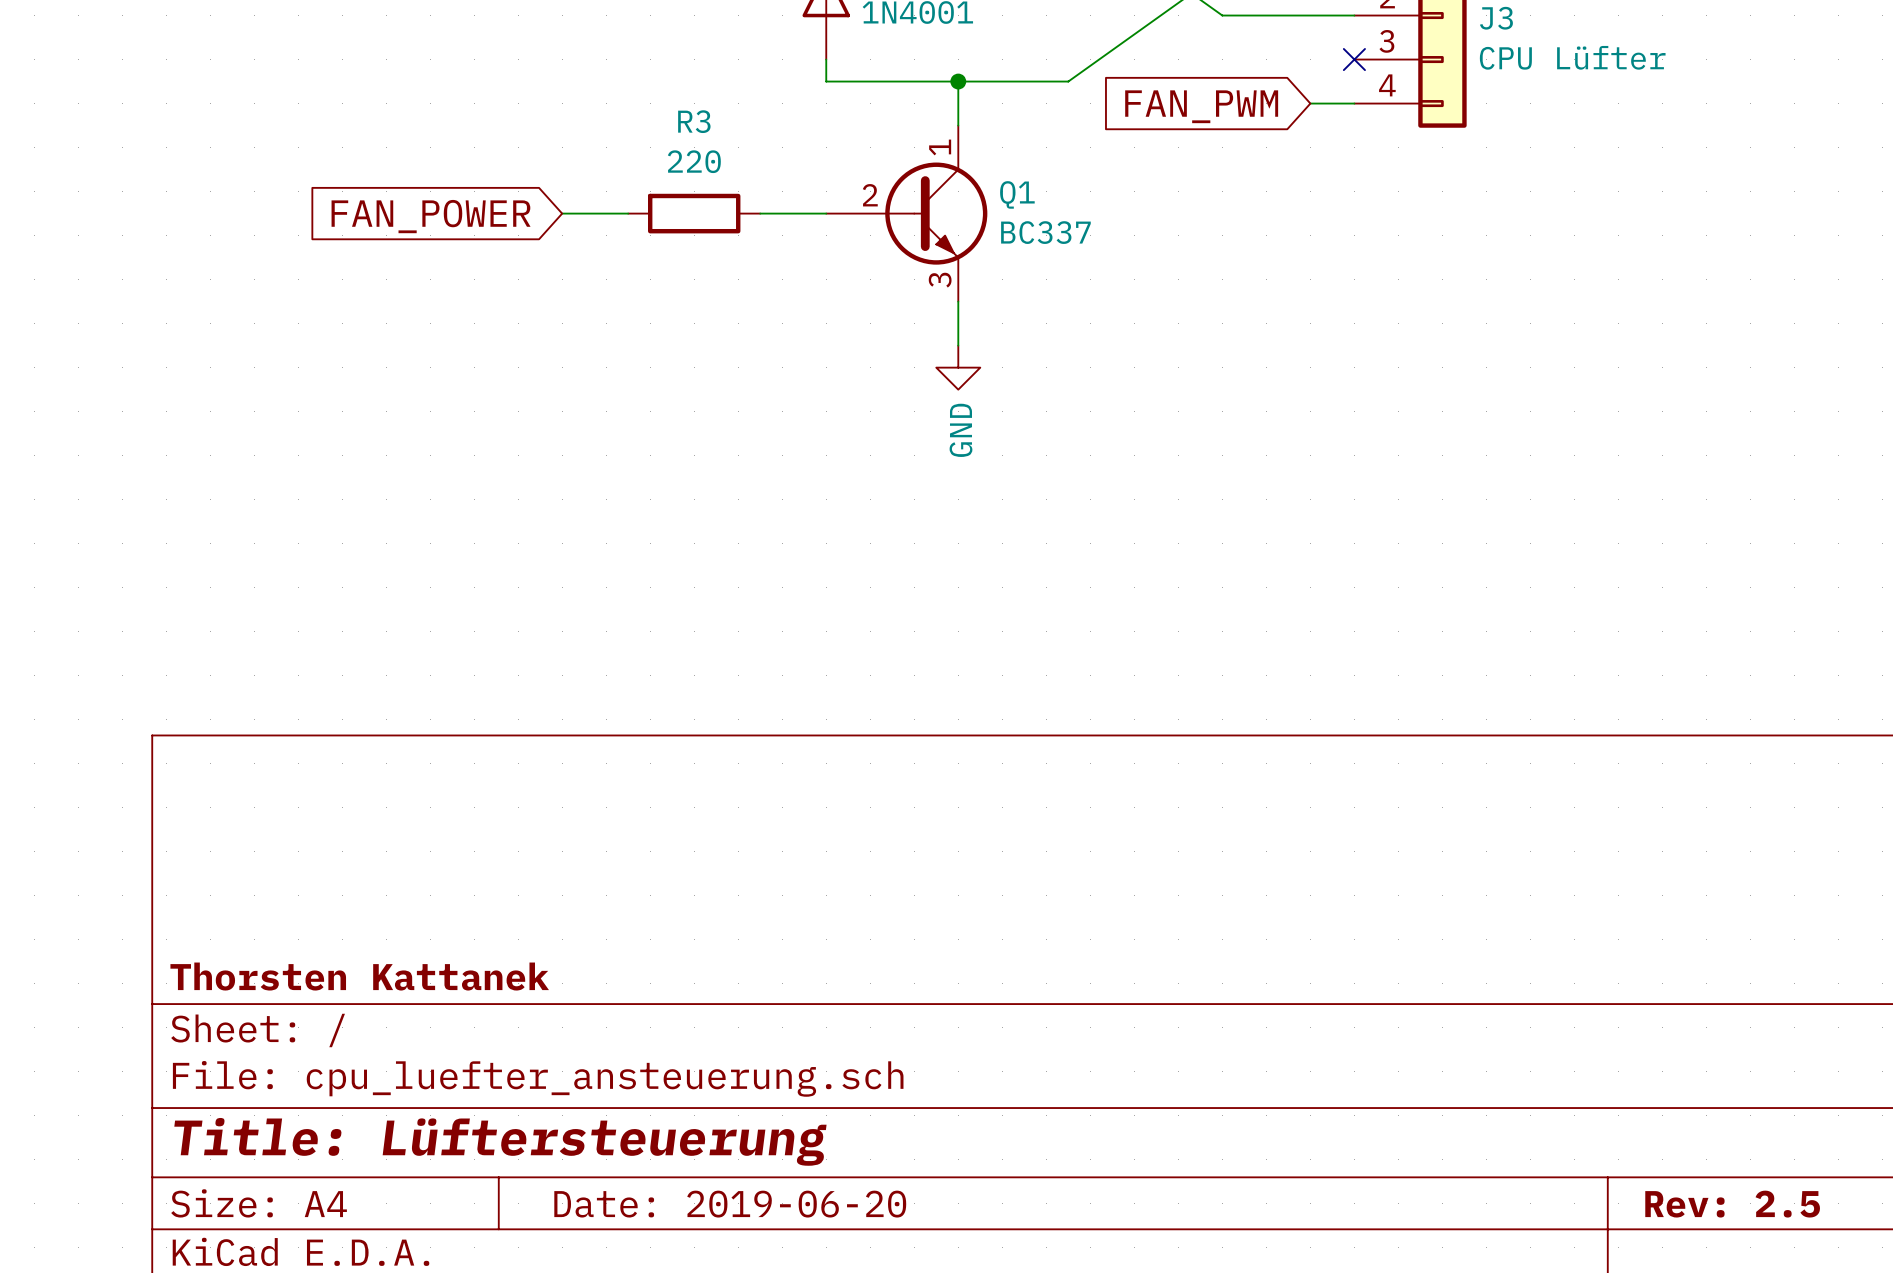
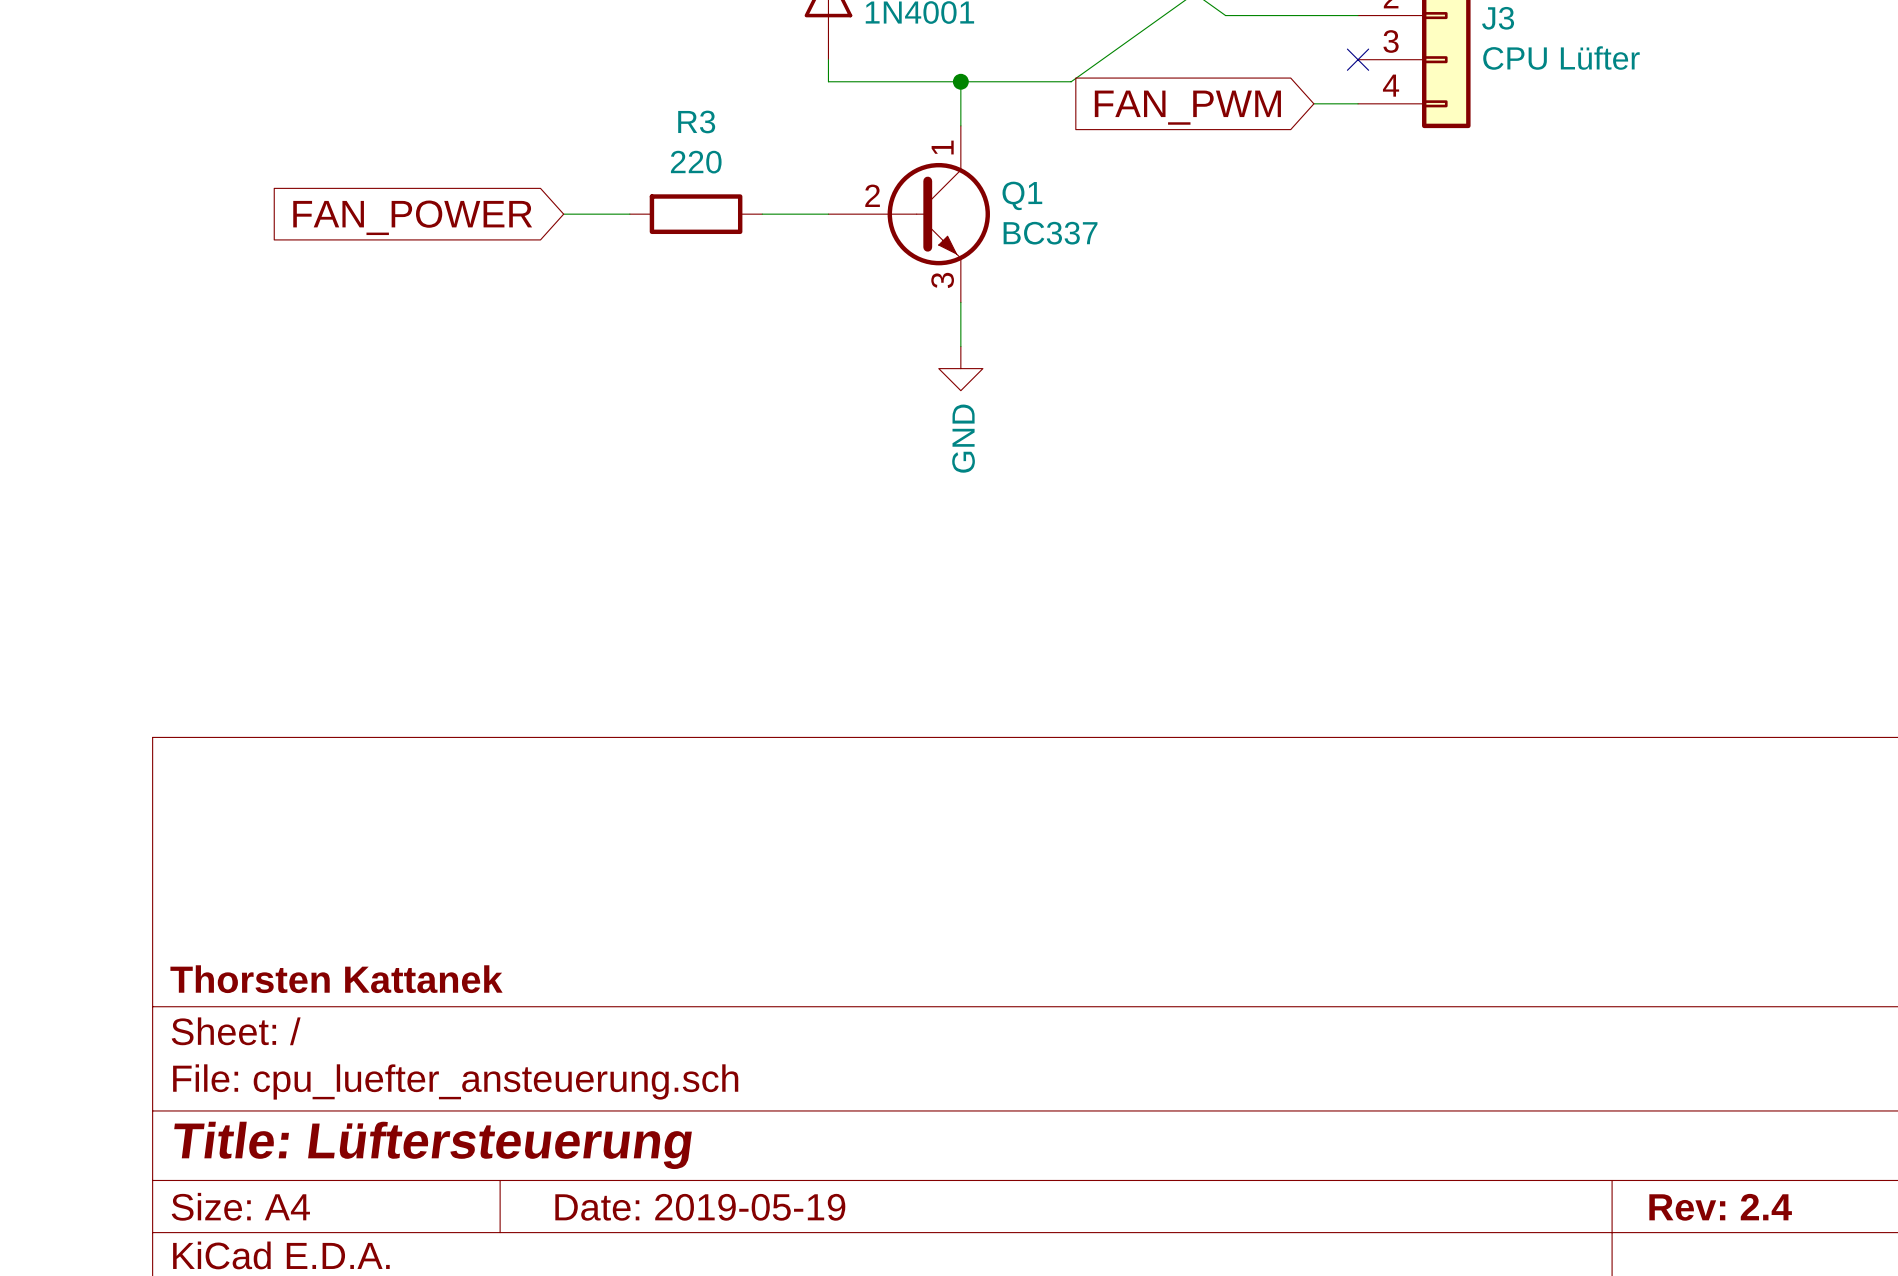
title block: Date: 2019-06-20 (730, 1204) -> Date: 2019-05-19 (700, 1207)
title block: Rev: 2.5 (1732, 1204) -> Rev: 2.4 (1720, 1207)

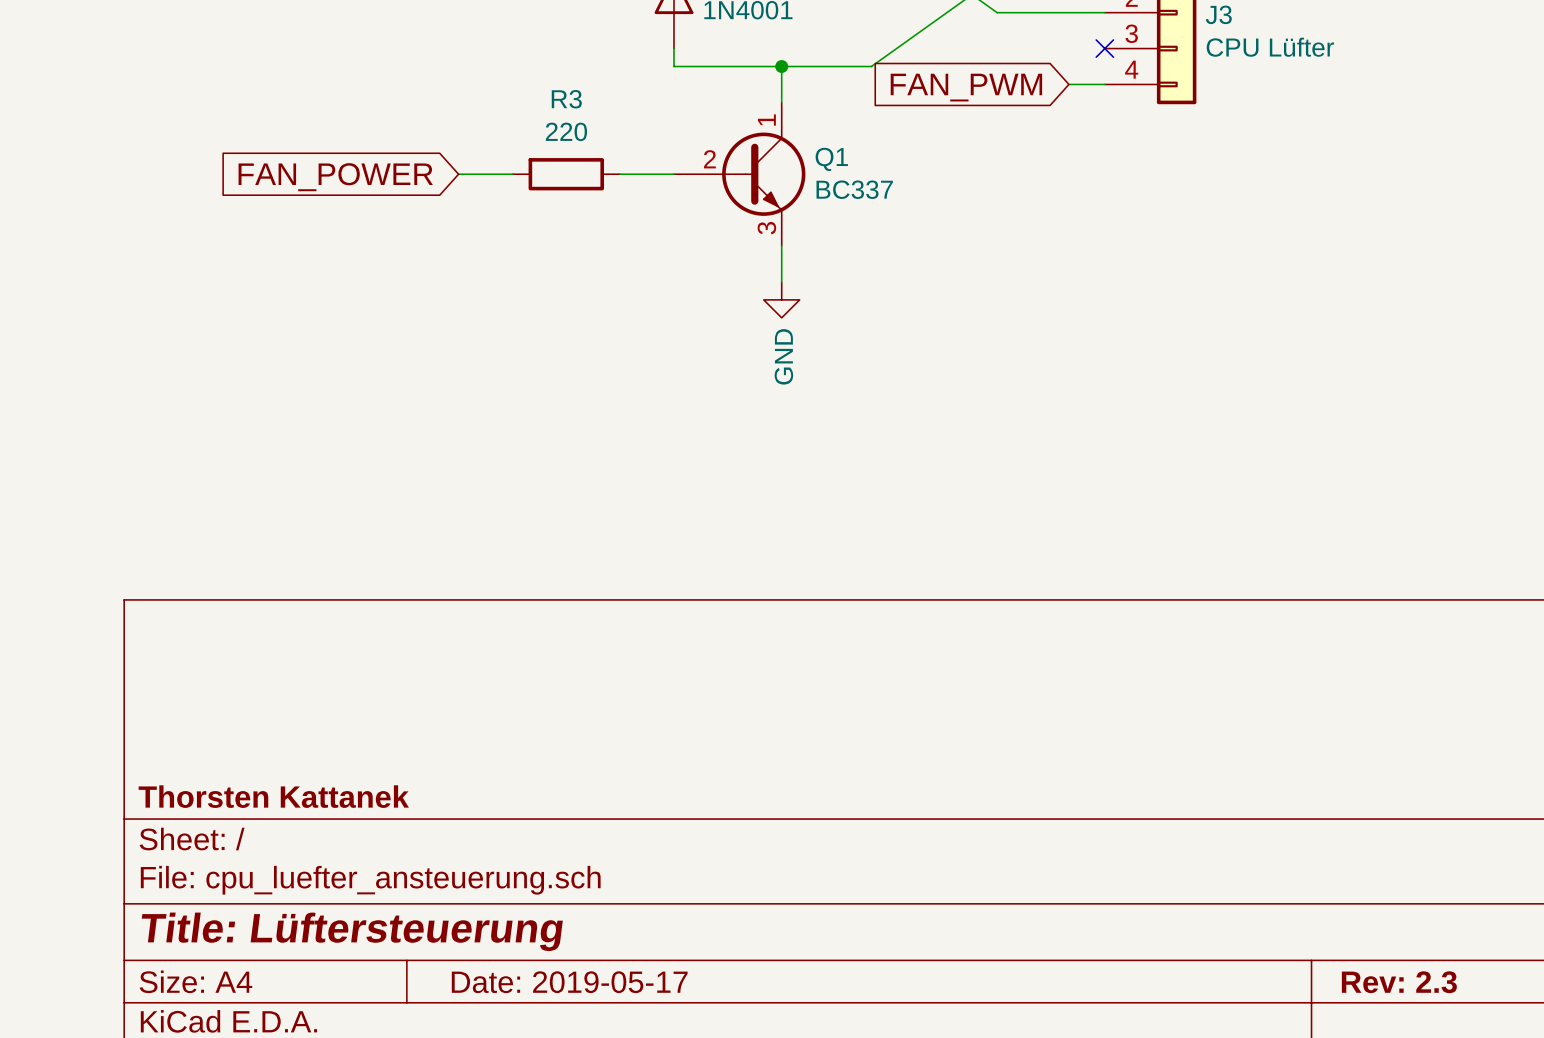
title block: Date: 2019-05-19 (700, 1207) -> Date: 2019-05-17 (569, 982)
title block: Rev: 2.4 (1720, 1207) -> Rev: 2.3 (1399, 982)

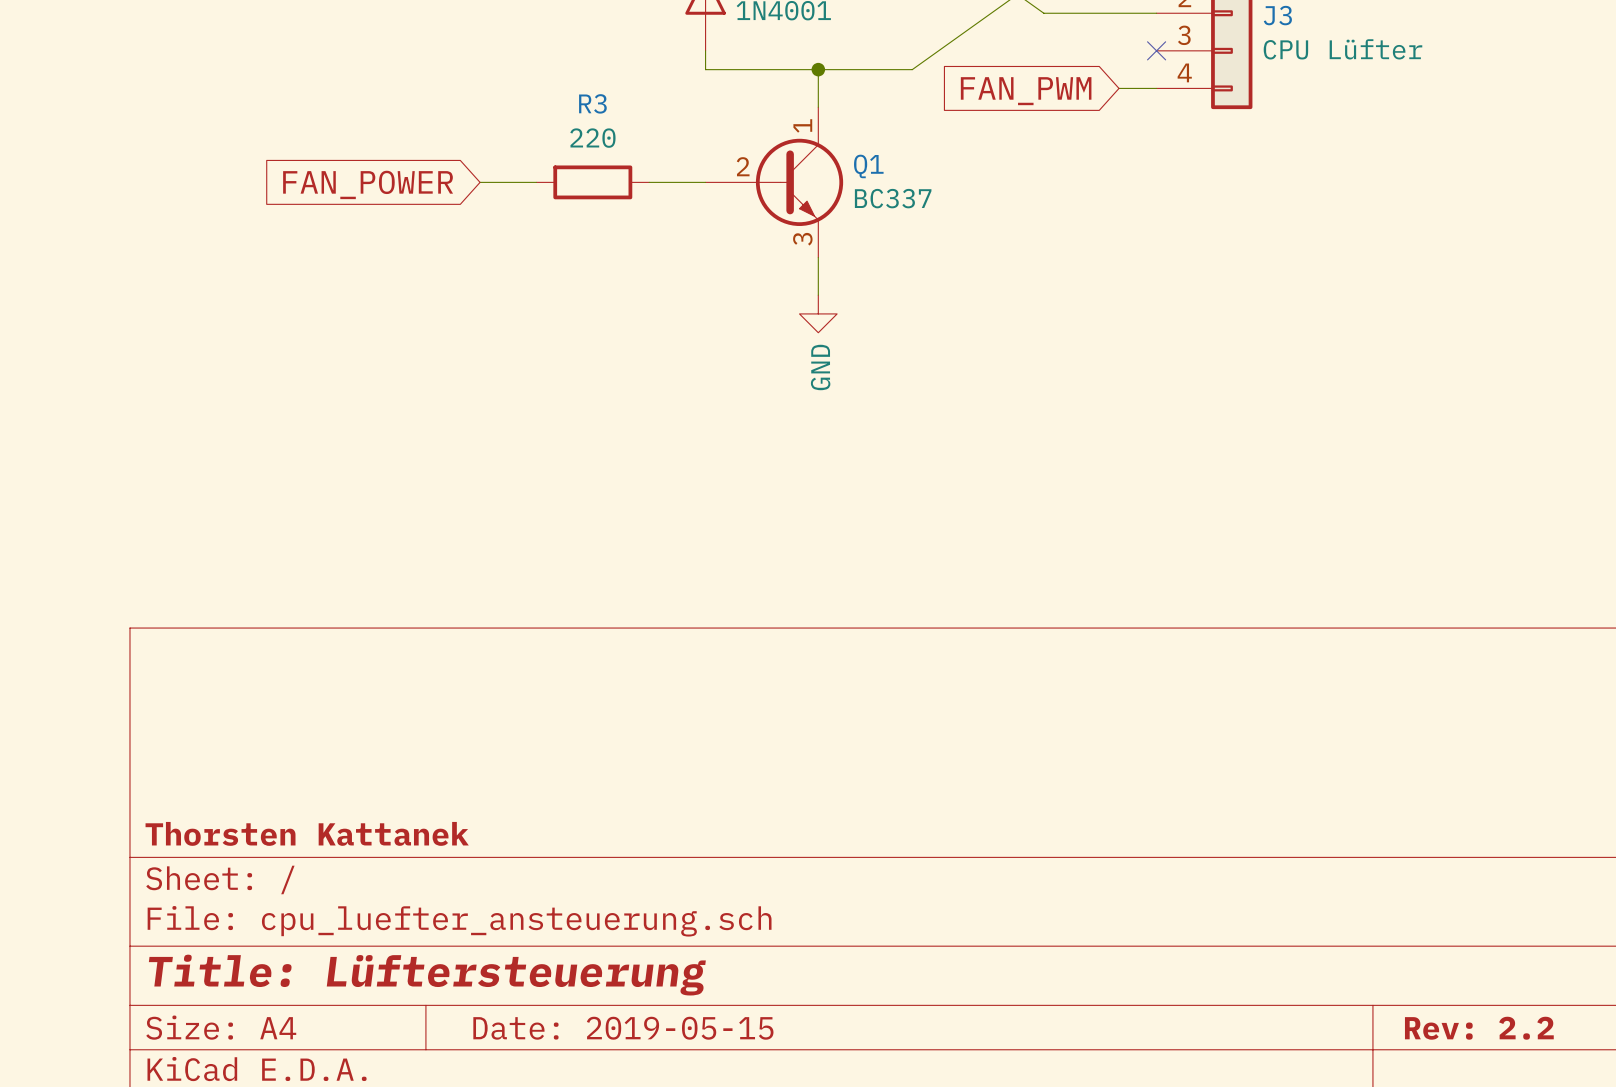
title block: Date: 2019-05-17 (569, 982) -> Date: 2019-05-15 (623, 1028)
title block: Rev: 2.3 (1399, 982) -> Rev: 2.2 (1479, 1028)

